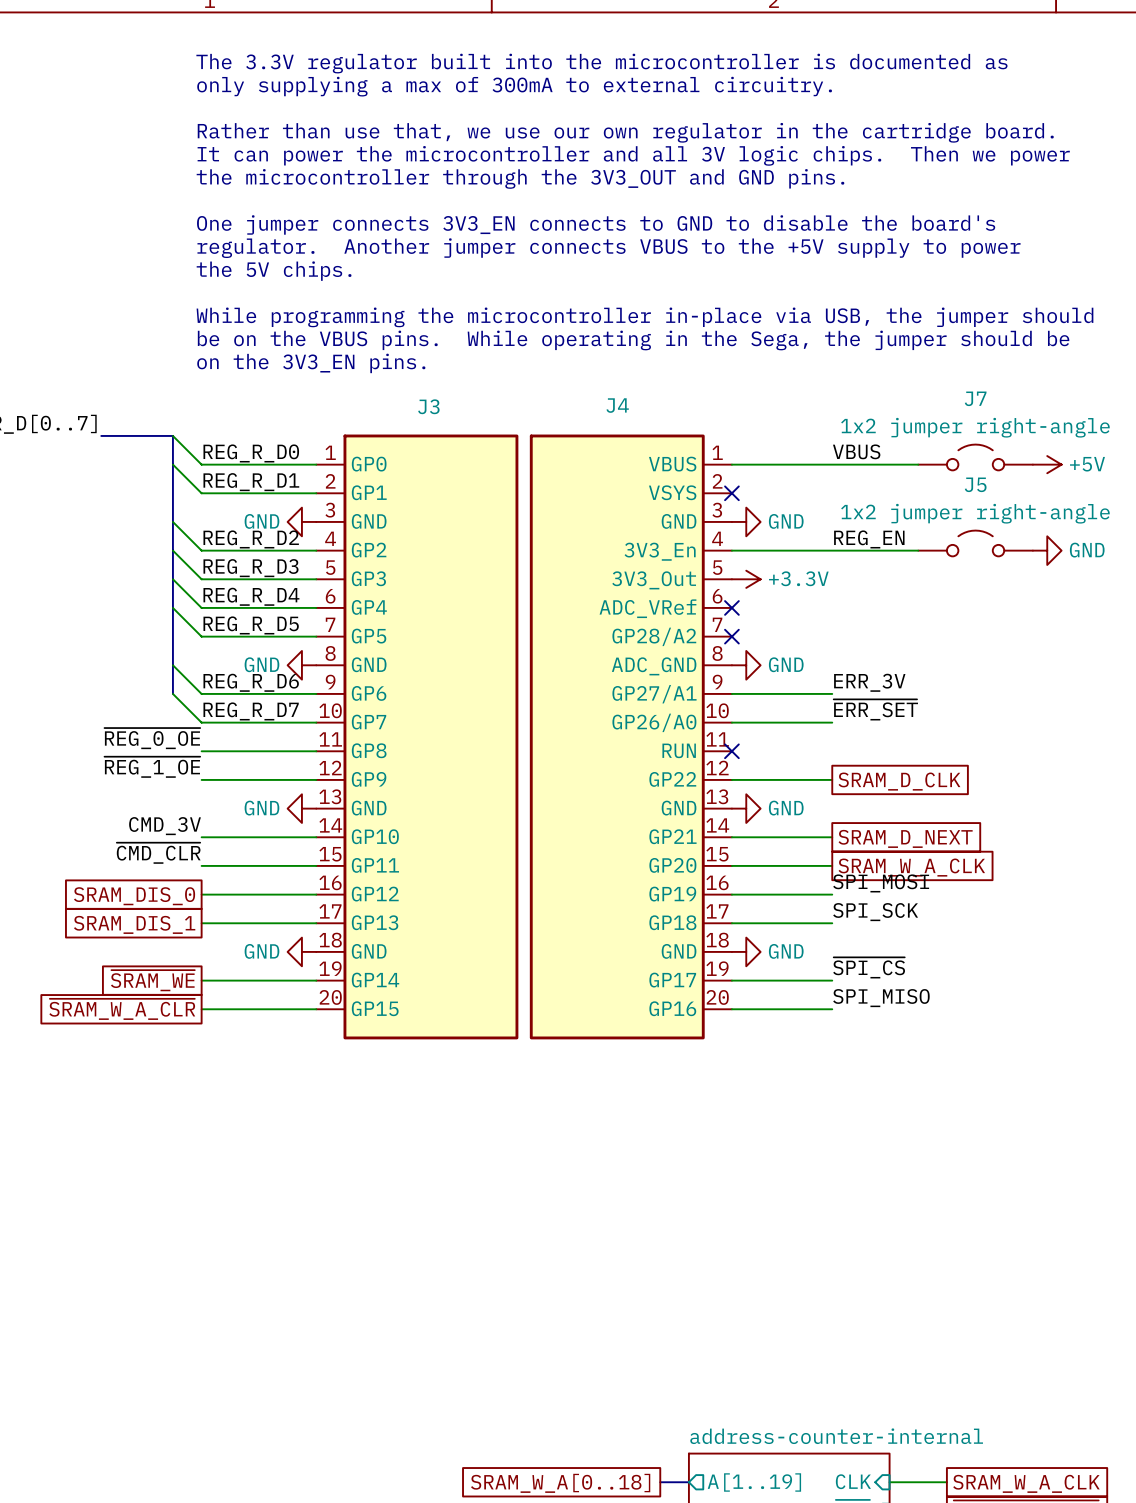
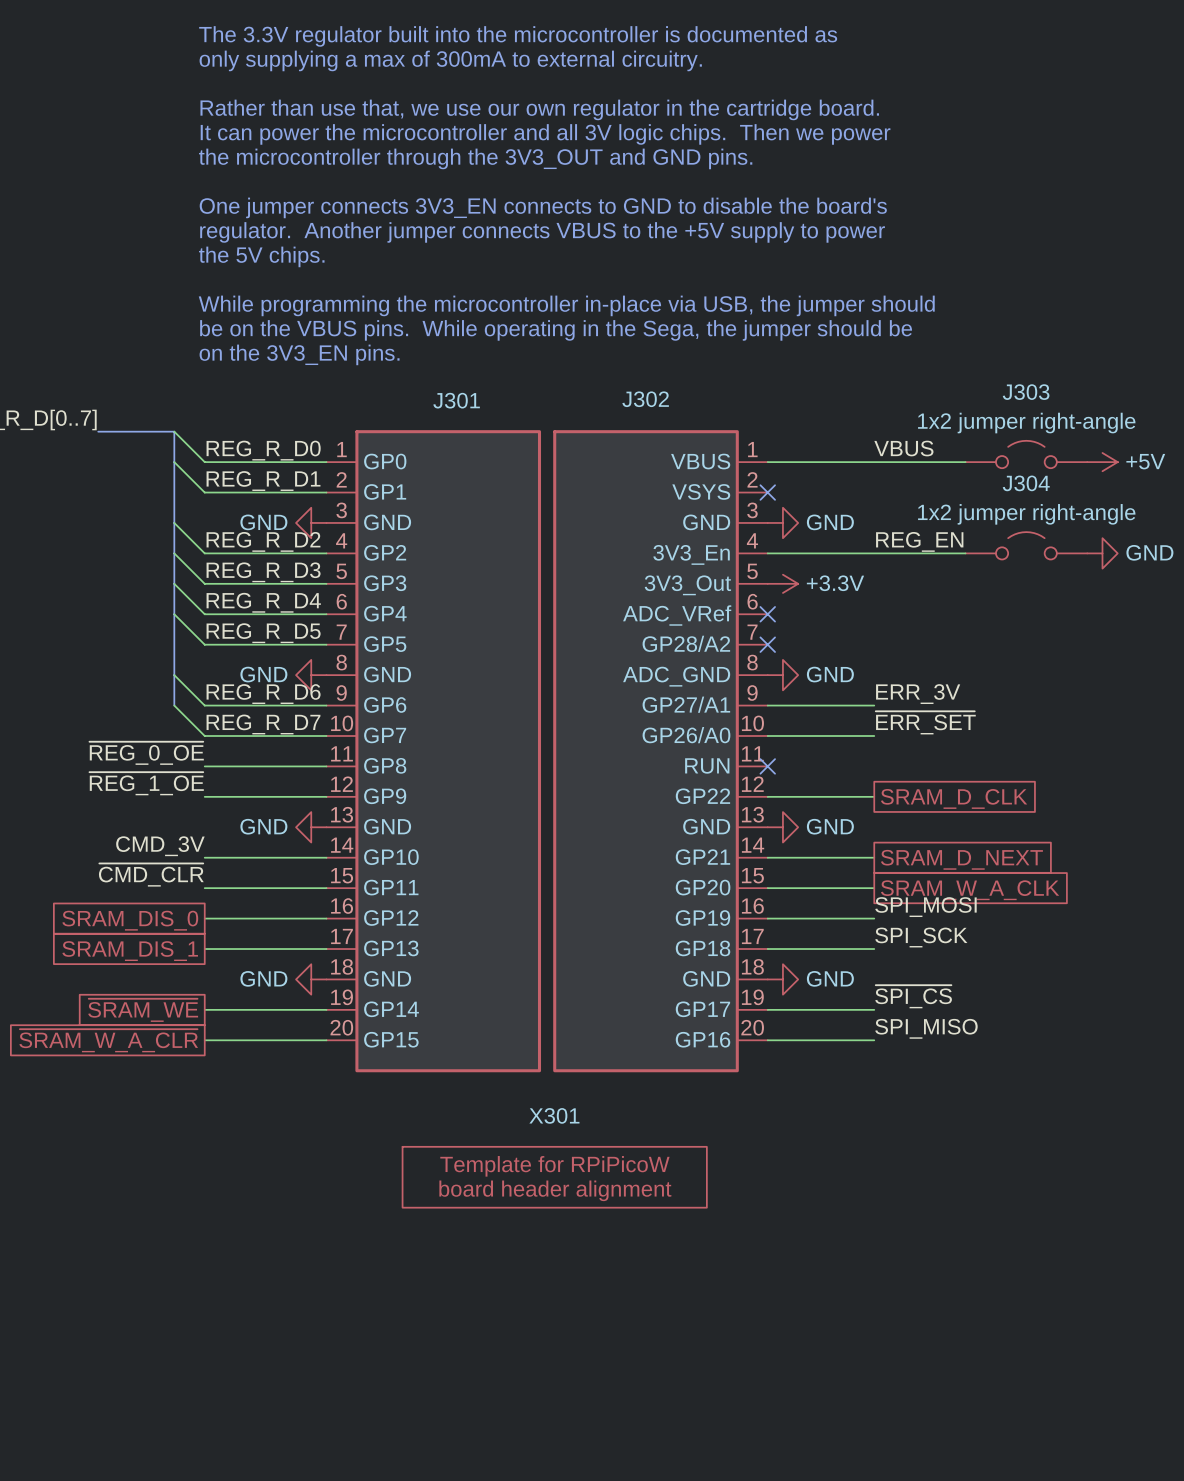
J7 name: J7 (975, 398) -> J303 (1026, 392)
J4 name: J4 (617, 405) -> J302 (645, 399)
J3 name: J3 (428, 406) -> J301 (456, 400)
J5 name: J5 (975, 484) -> J304 (1026, 483)
X301: none -> (554, 1177)

